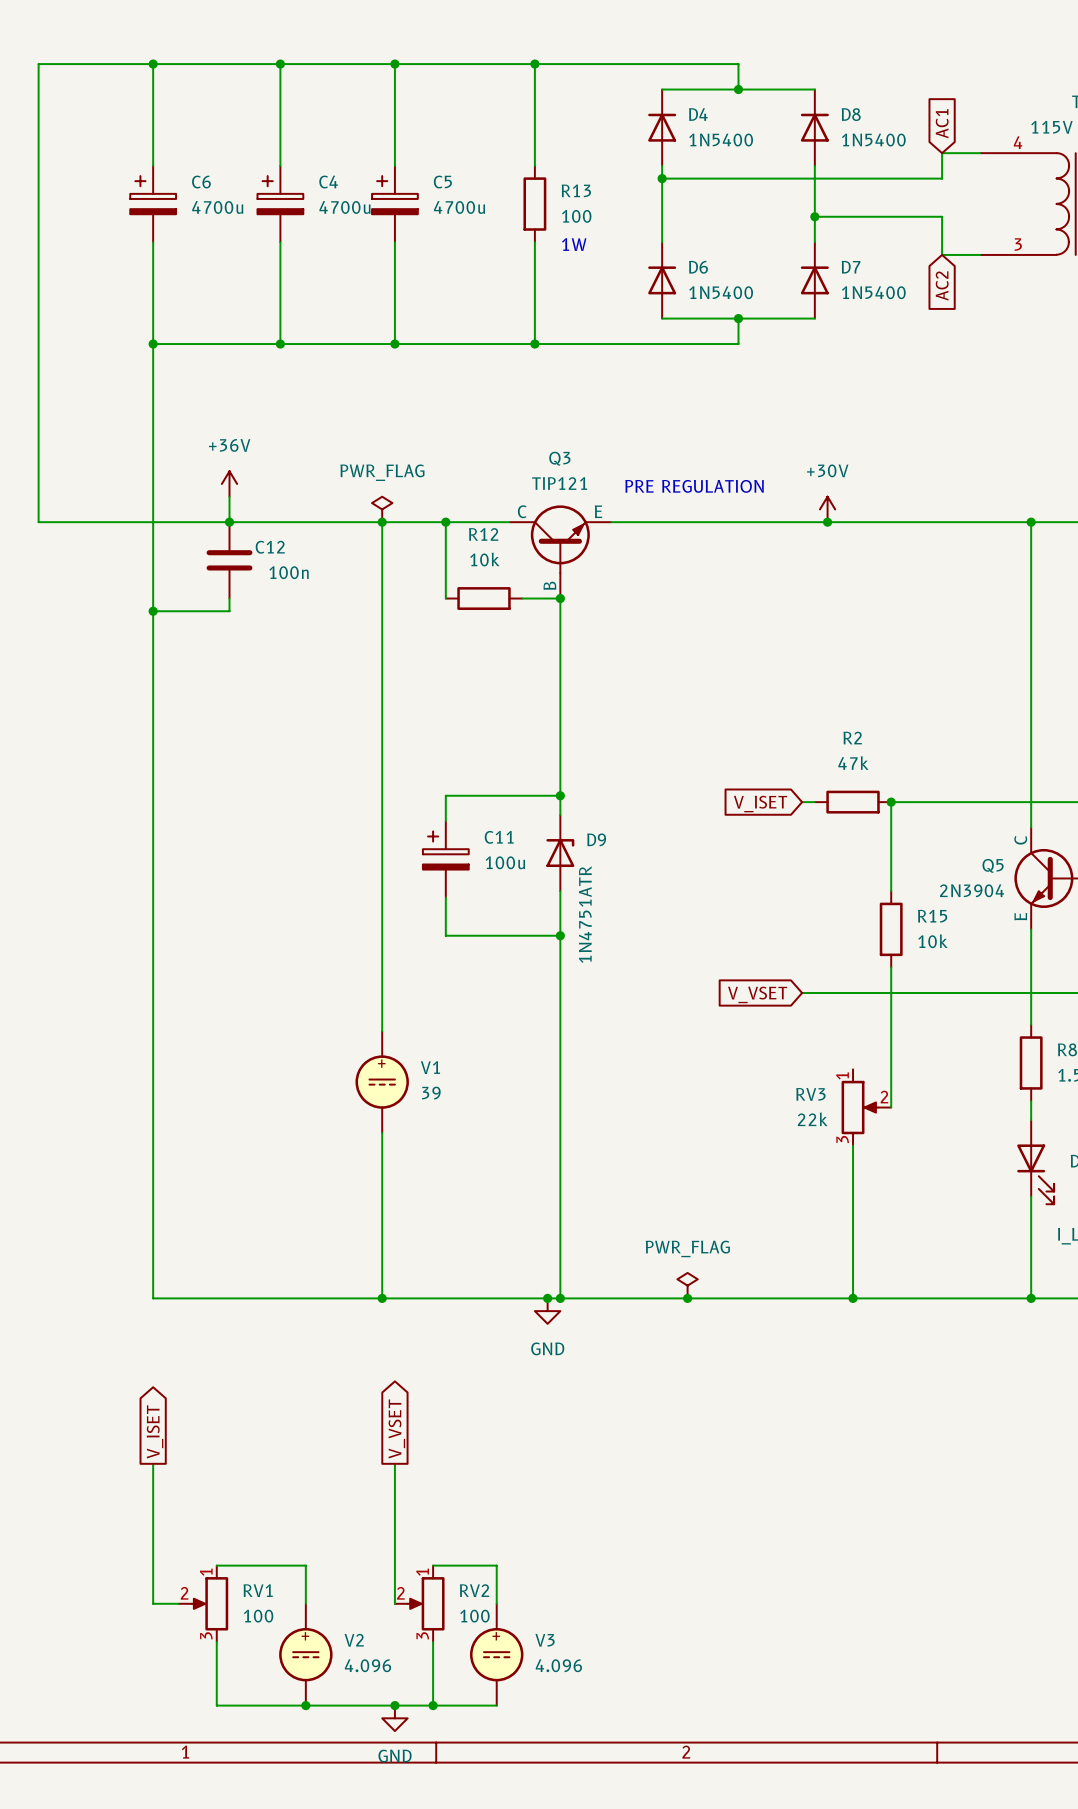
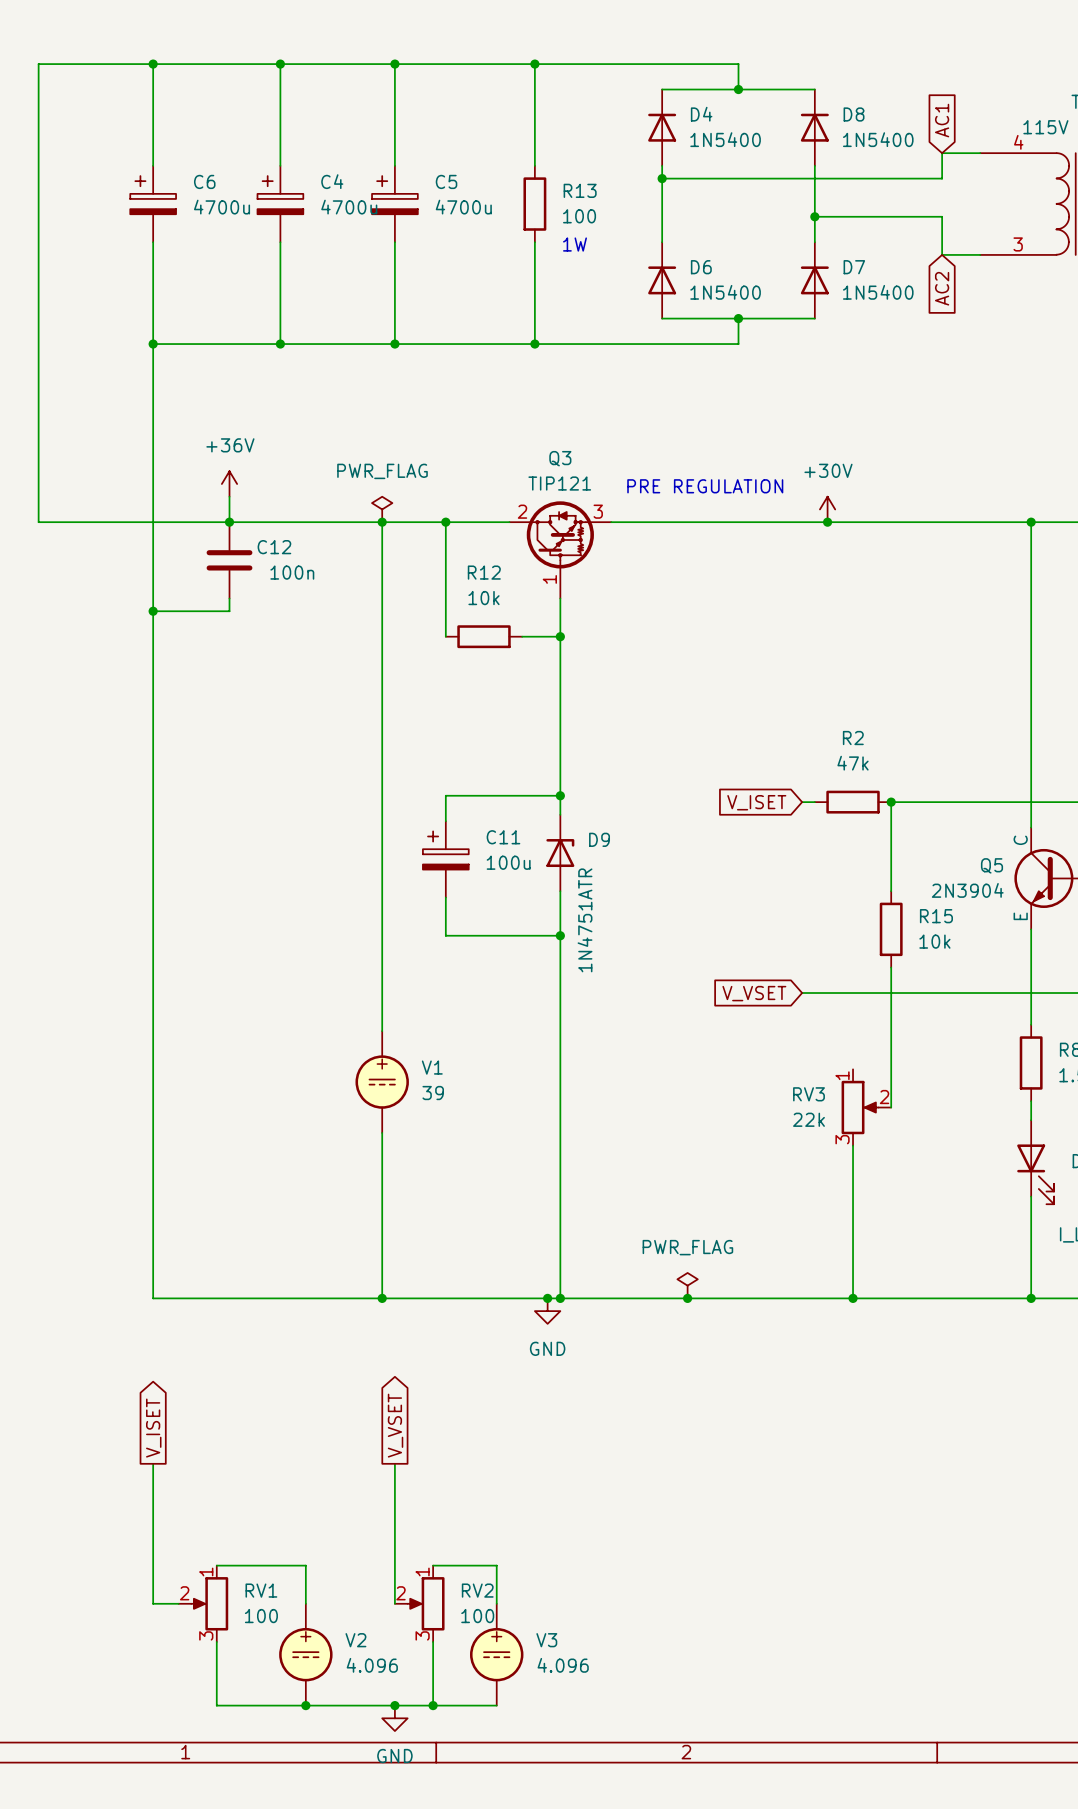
Q3 symbol: [509, 505, 612, 599] -> [509, 501, 612, 599]
wire: none -> (445, 598) (445, 636)
R12 position: (484, 598) -> (484, 636)
wire: (522, 598) (560, 598) -> (522, 636) (560, 636)
junction position: (560, 598) -> (560, 636)

